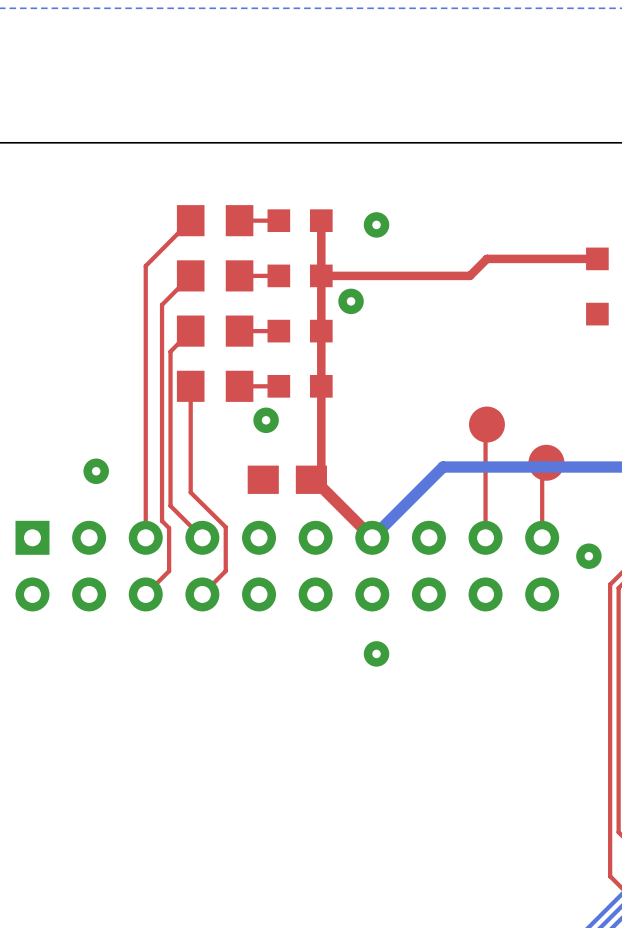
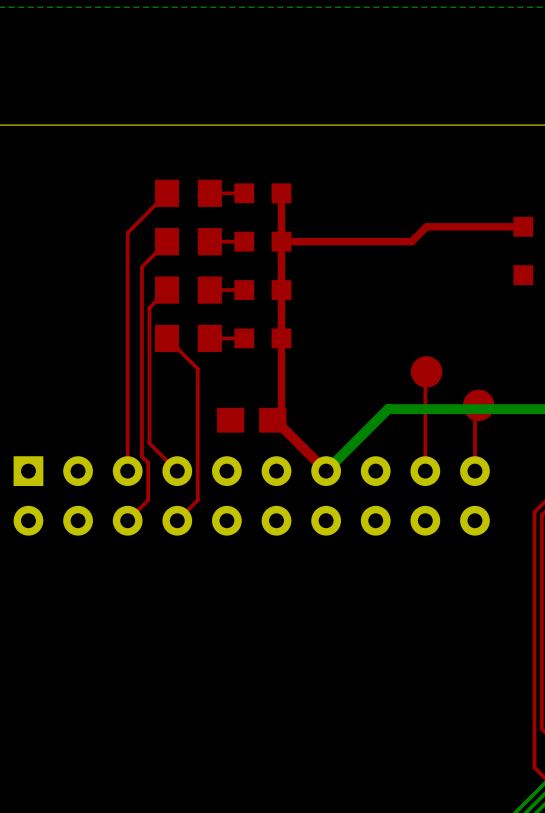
via: (376, 224) -> none
via: (351, 301) -> none
top track: (190, 386) (190, 492) (225, 527) -> (167, 338) (197, 368) (197, 461)
via: (266, 420) -> none
via: (96, 471) -> none
via: (588, 556) -> none
via: (376, 653) -> none

